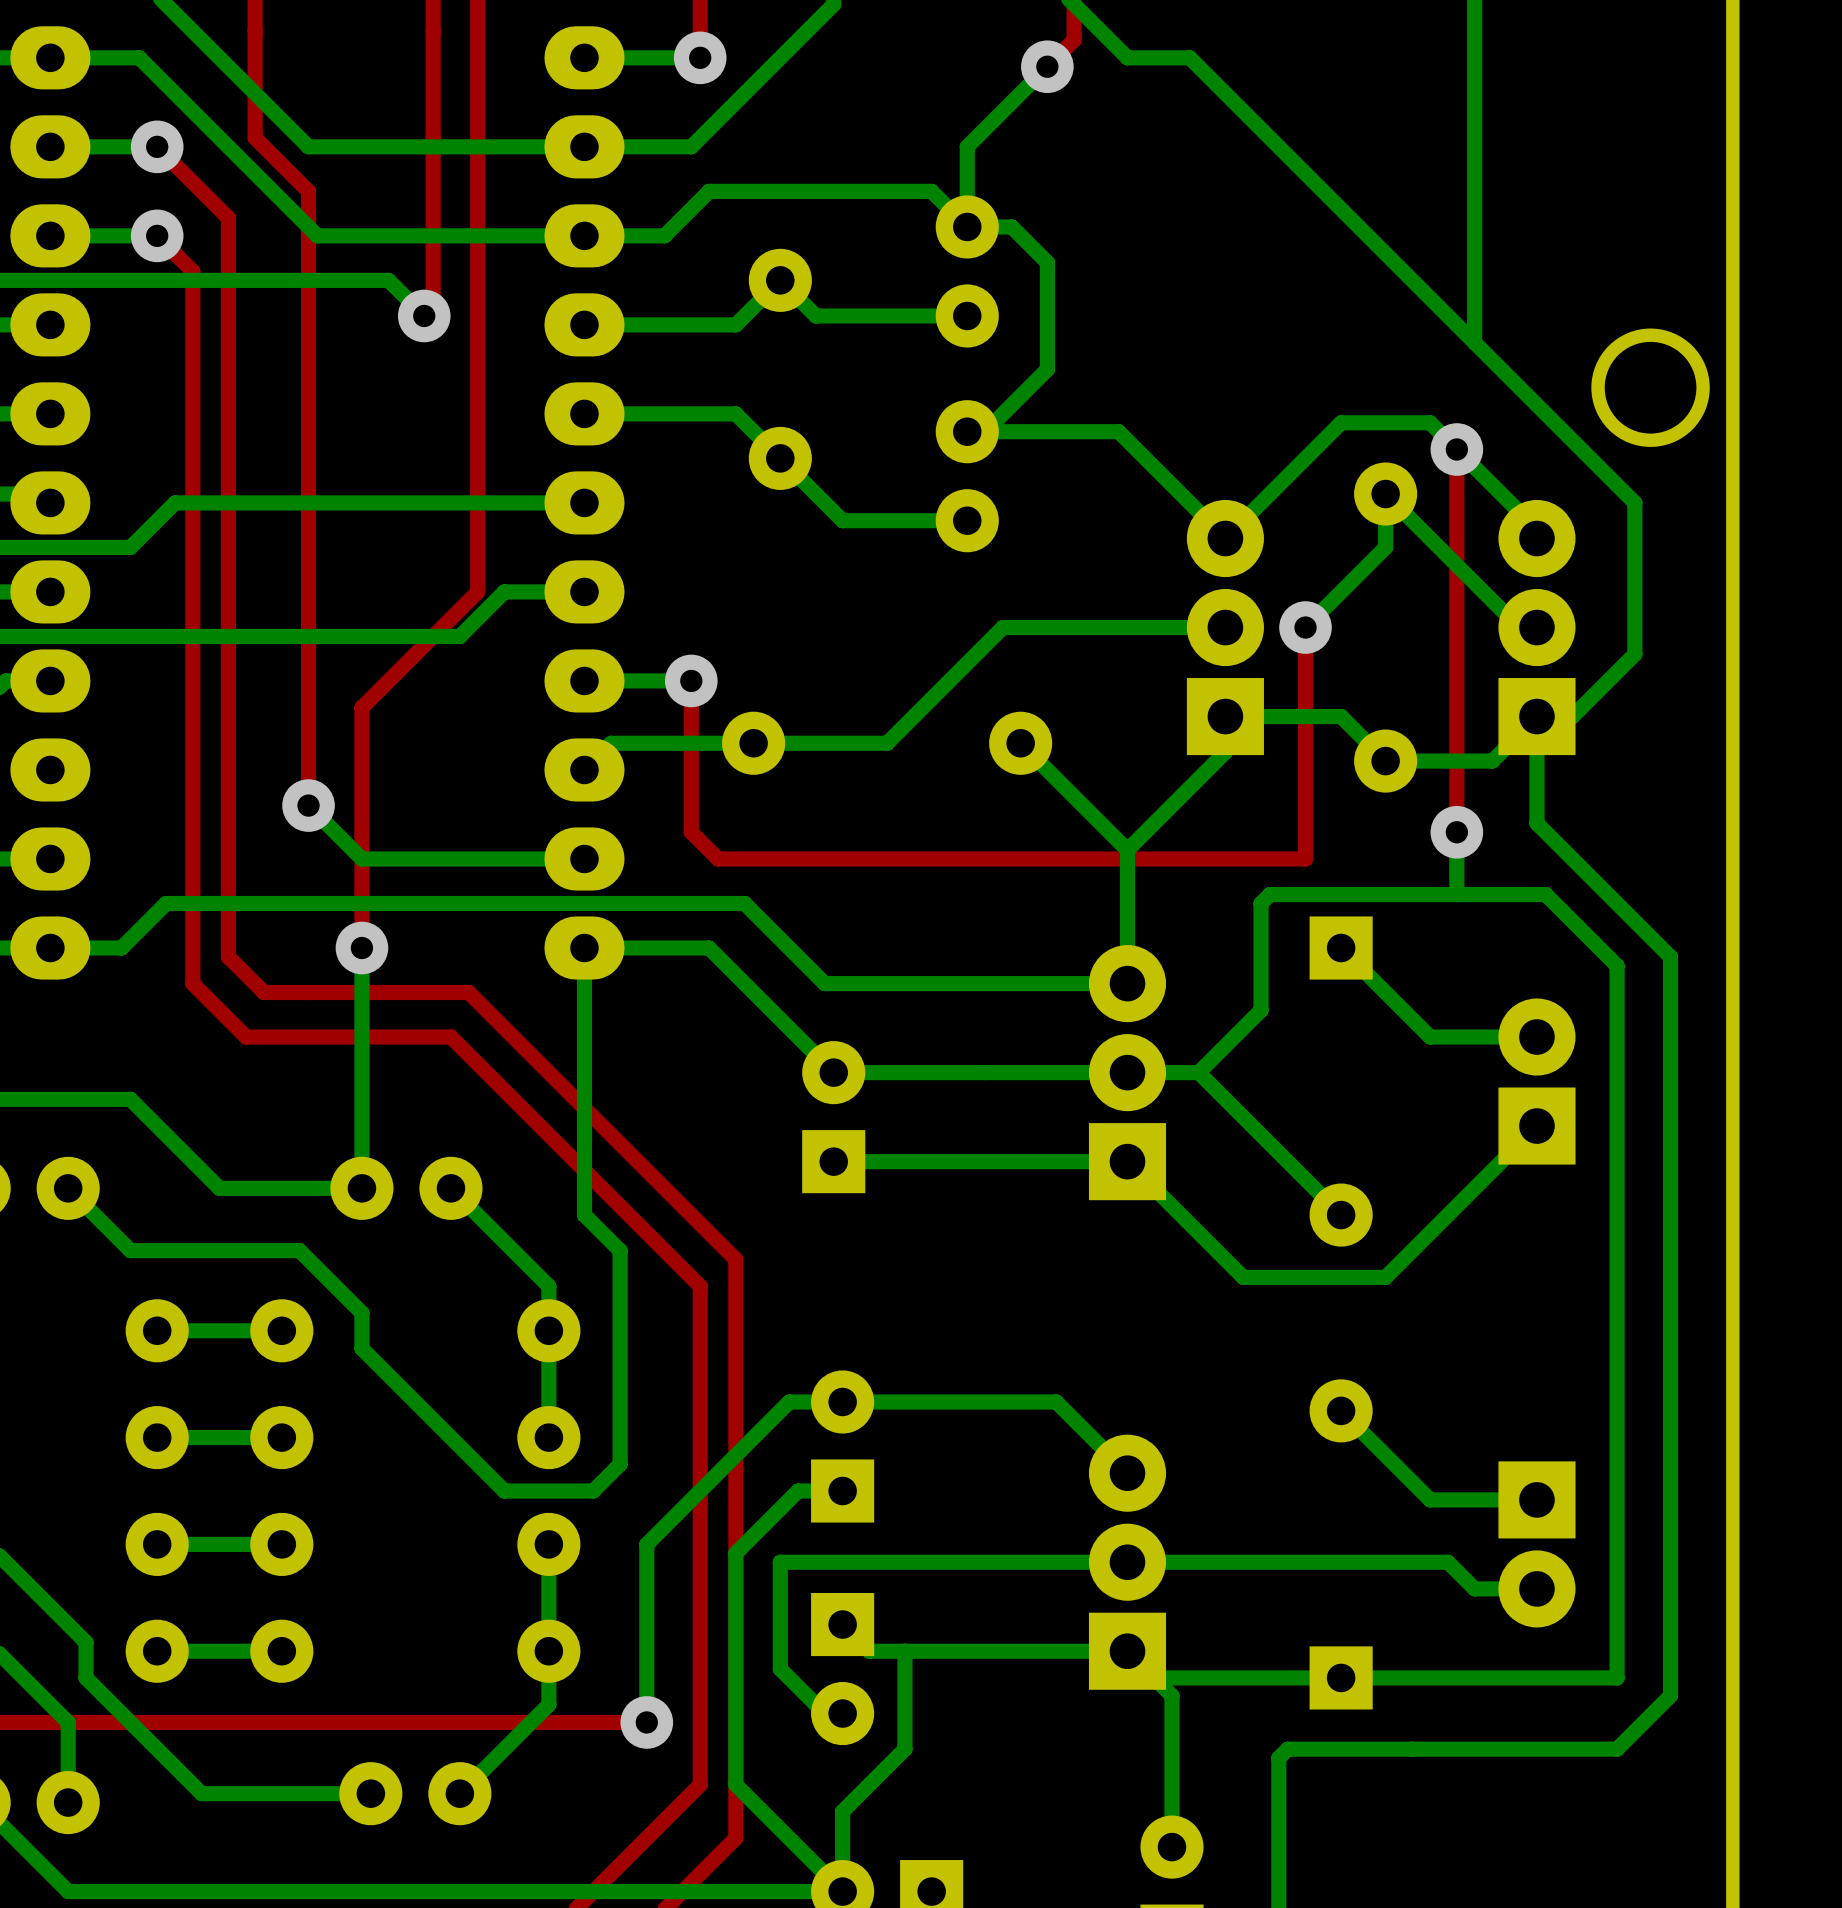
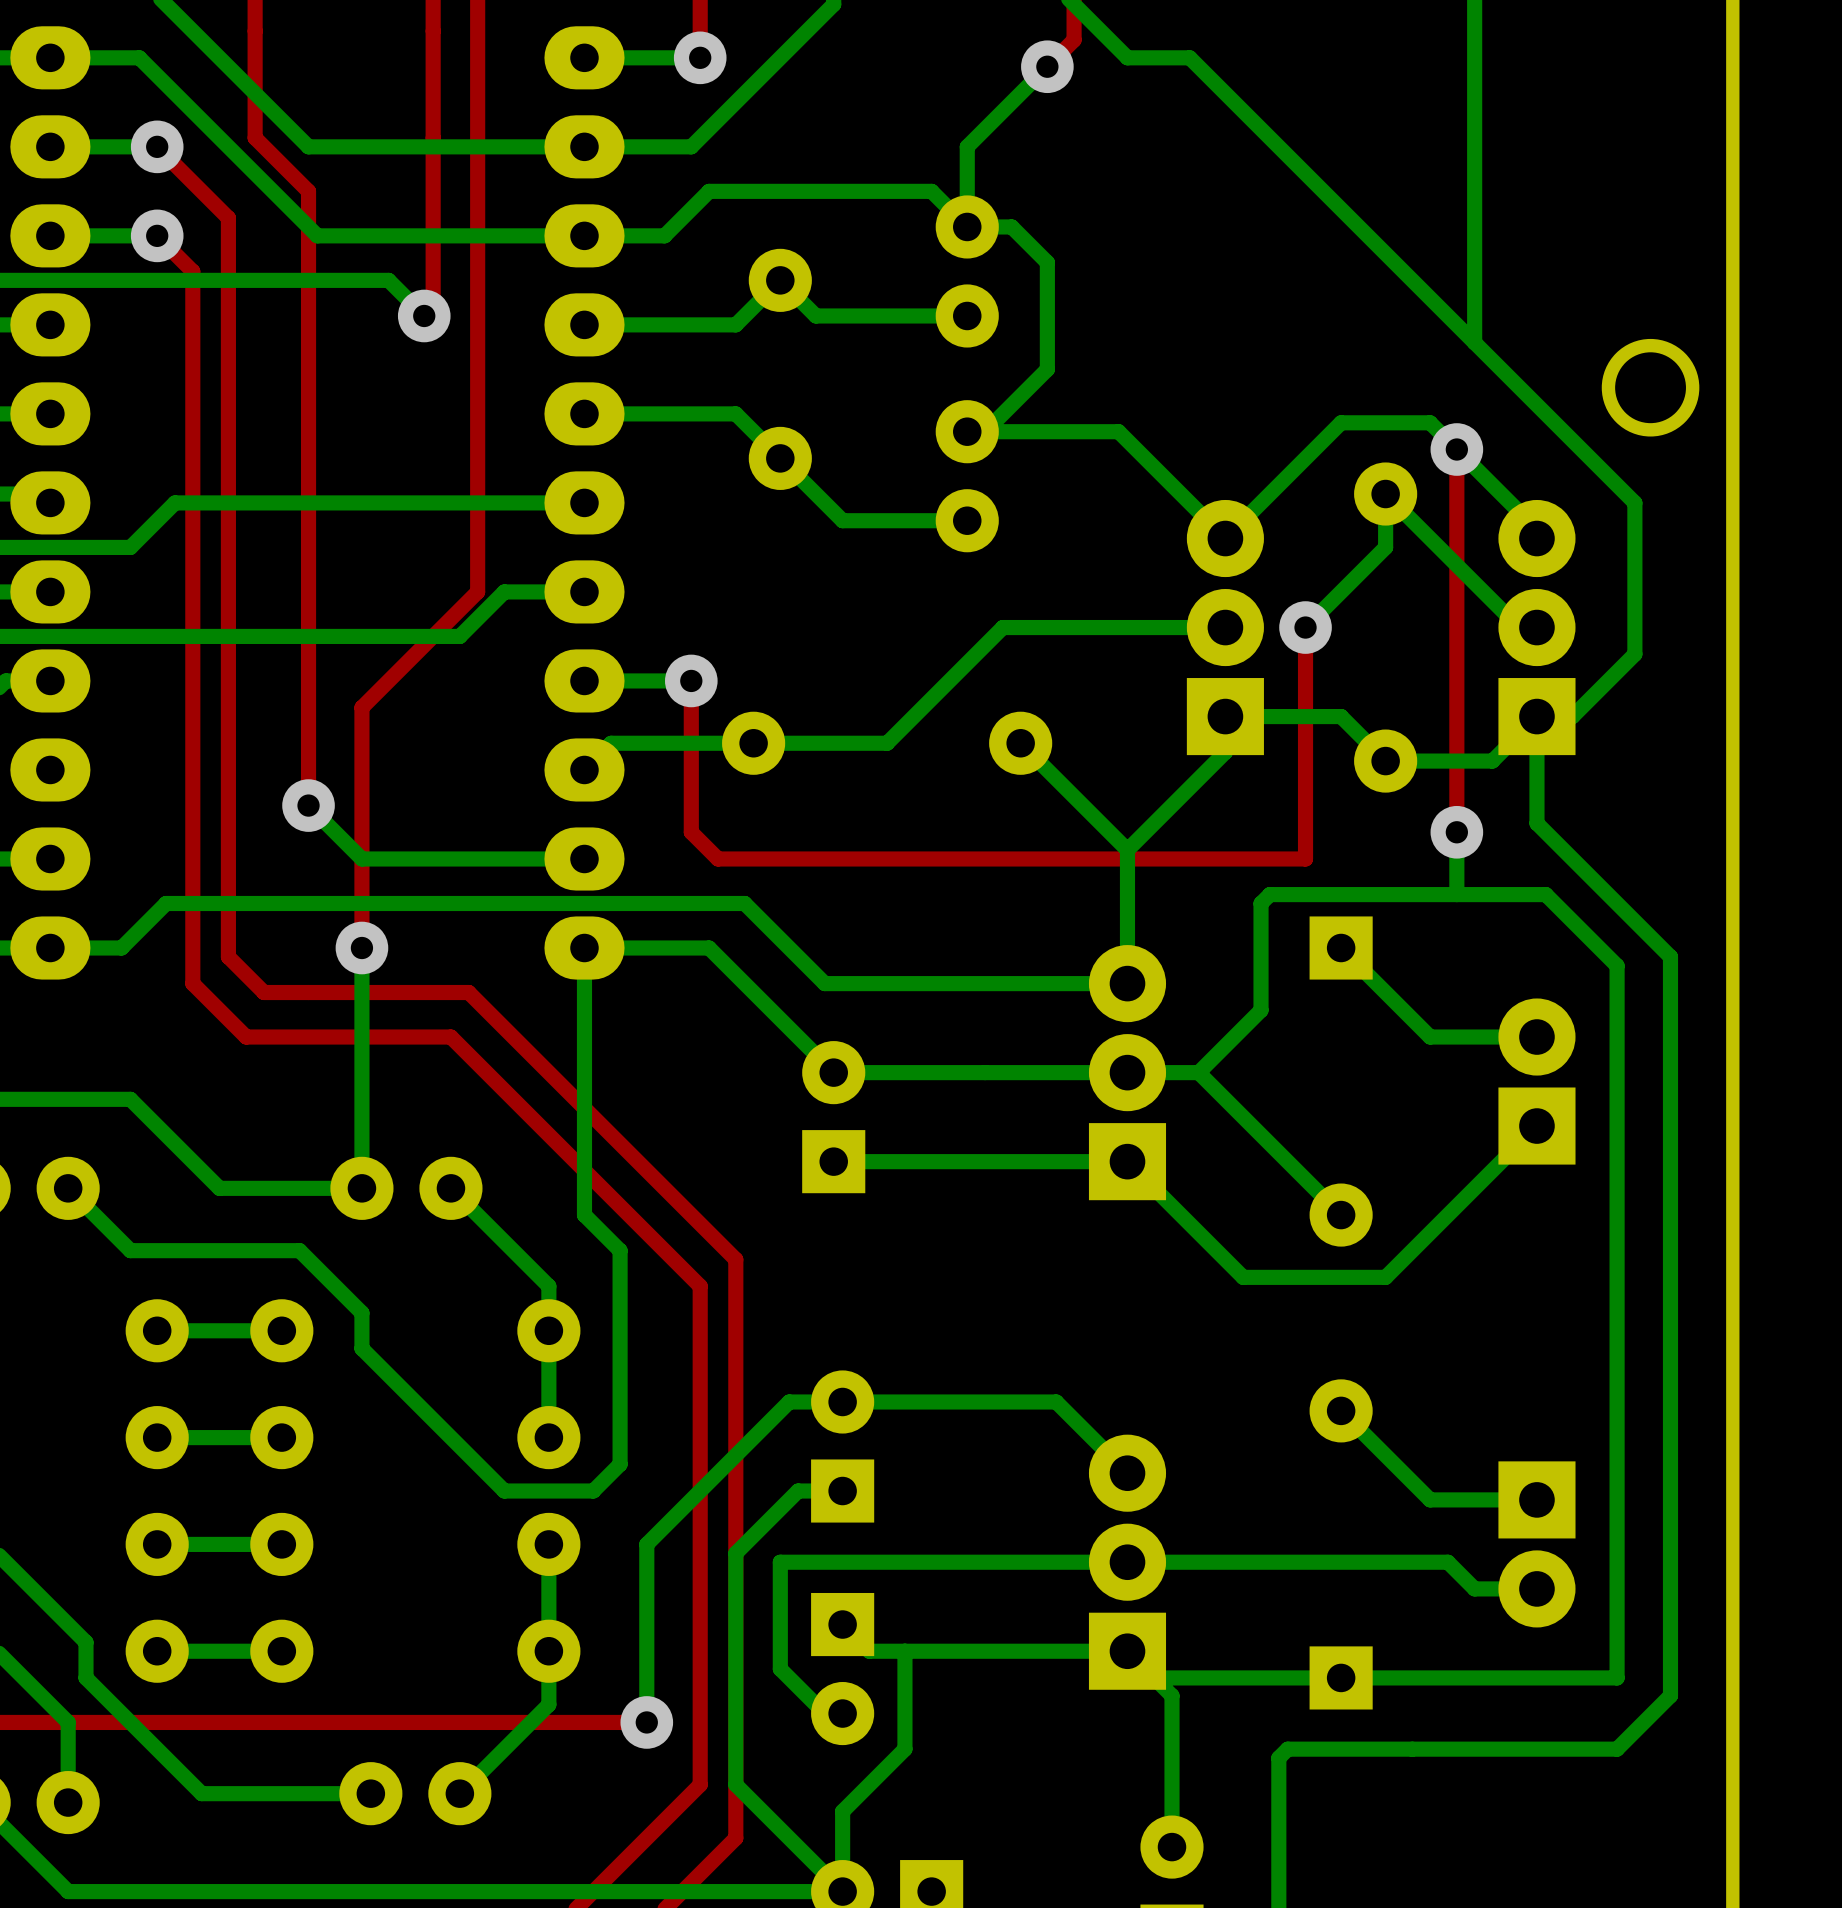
round board edge size: [1591, 328, 1710, 447] -> [1601, 338, 1700, 437]

